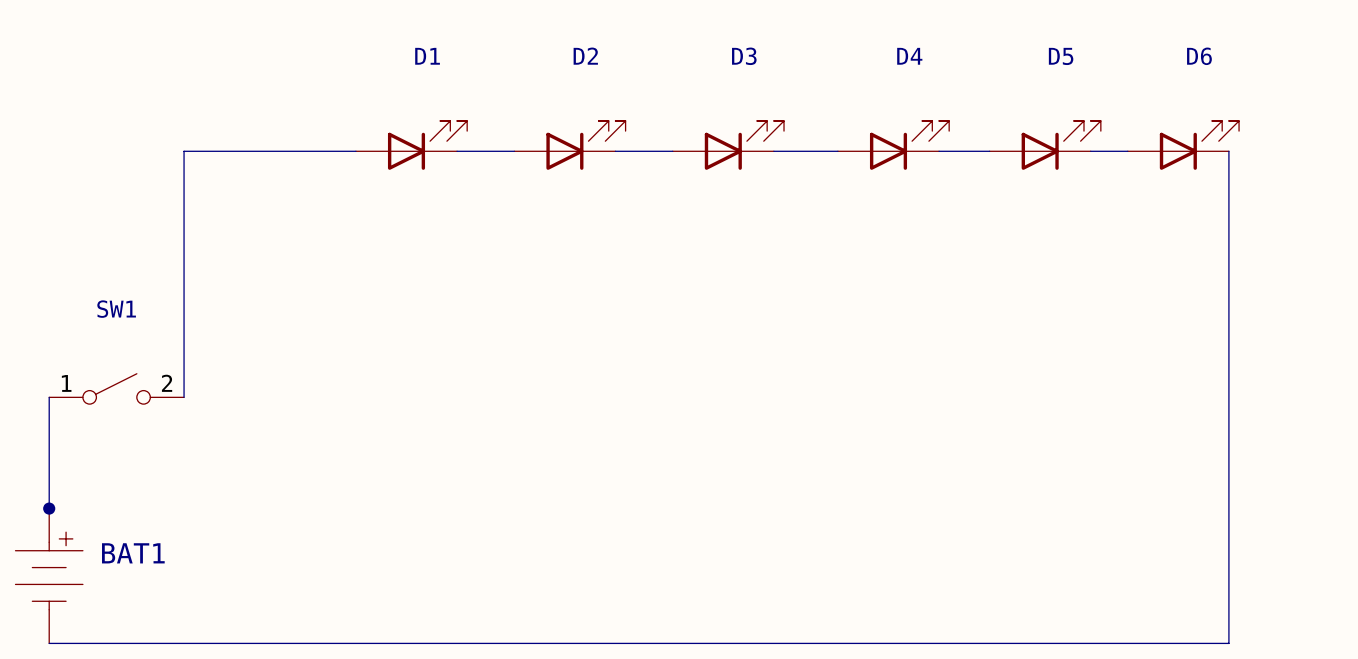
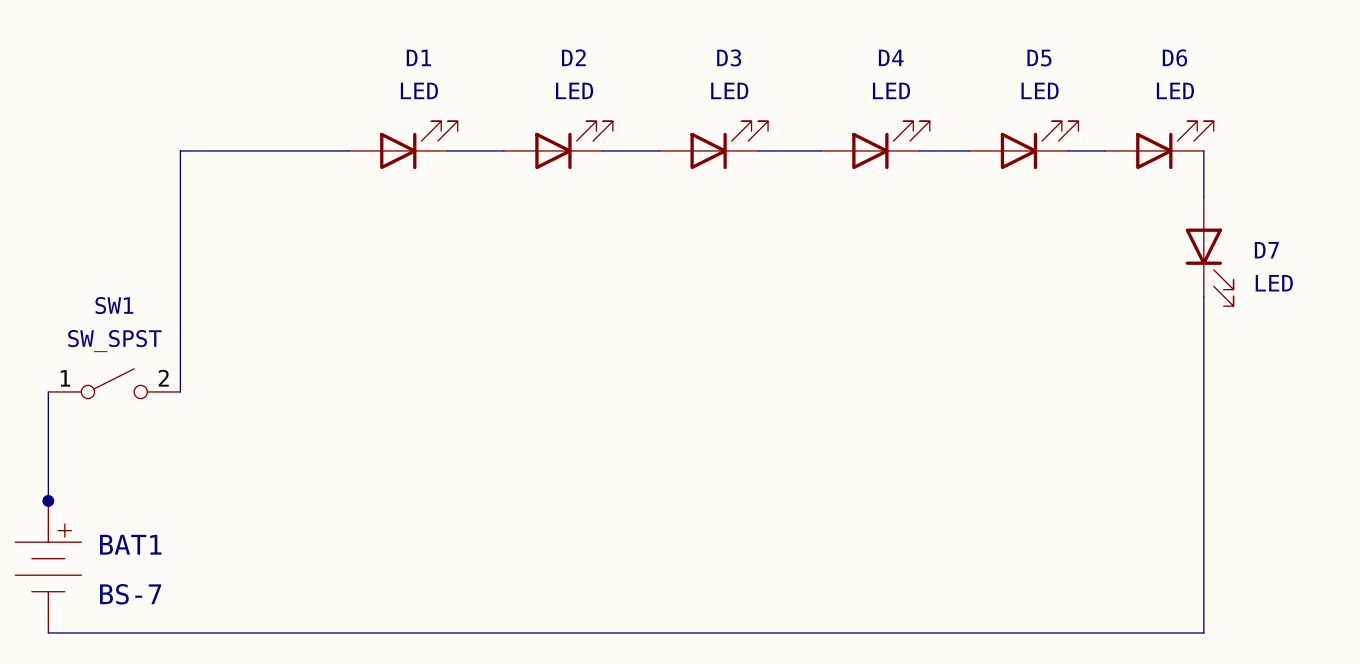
D1 value: none -> LED (419, 90)
D2 value: none -> LED (574, 90)
D3 value: none -> LED (729, 90)
D4 value: none -> LED (891, 90)
D5 value: none -> LED (1040, 90)
D6 value: none -> LED (1175, 90)
D7: none -> LED (1209, 251)
SW1 value: none -> SW_SPST (114, 341)
BAT1 value: none -> BS-7 (130, 594)

